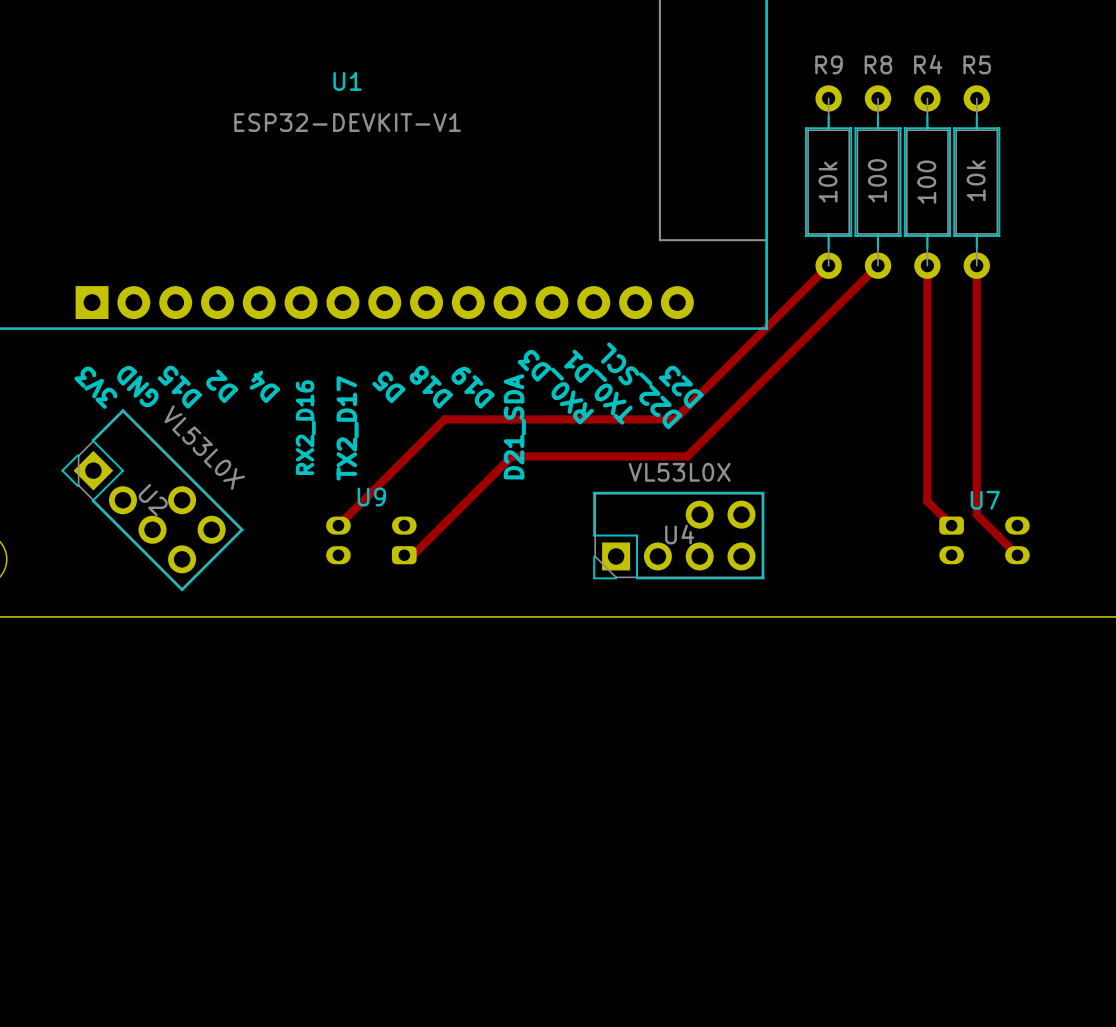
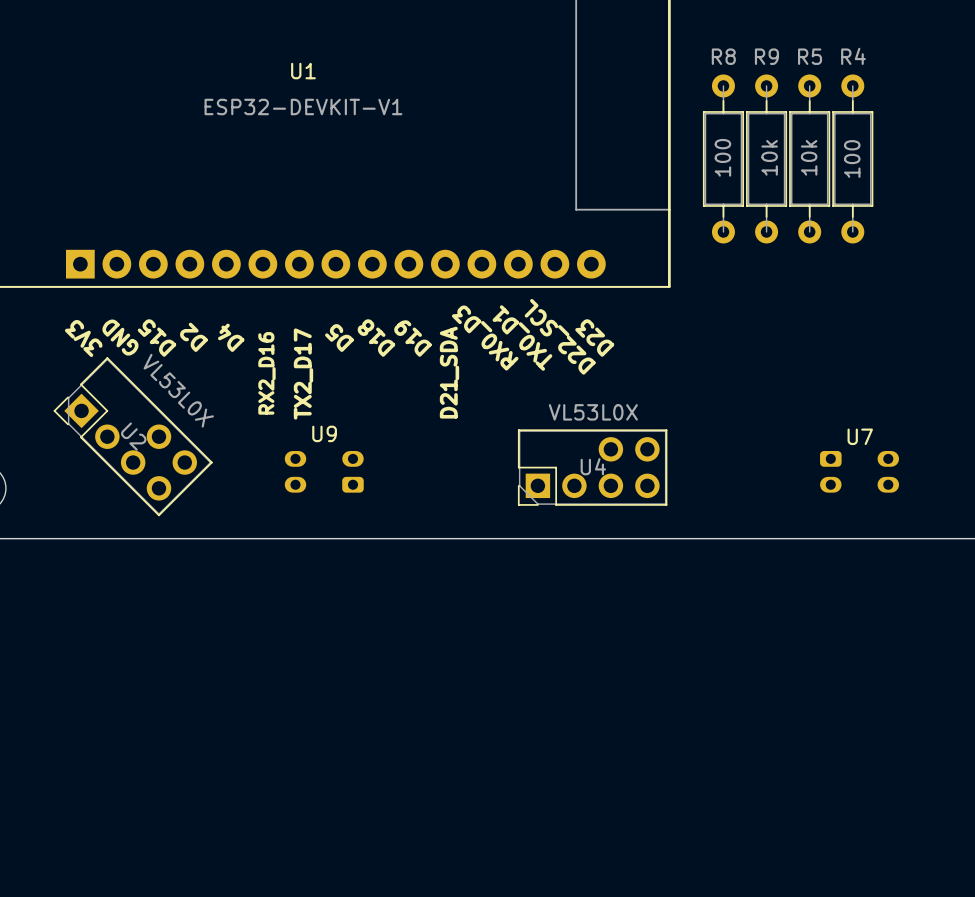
R9 name: R9 (829, 64) -> R8 (723, 56)
R8 name: R8 (878, 64) -> R9 (766, 56)
R4 name: R4 (928, 64) -> R5 (810, 56)
R5 name: R5 (977, 64) -> R4 (853, 56)
R8 value: 100 (877, 180) -> 10k (769, 157)
R5 value: 10k (976, 180) -> 100 (852, 158)
R9 value: 10k (828, 182) -> 100 (722, 157)
R4 value: 100 (926, 182) -> 10k (809, 157)
track: (828, 265) (674, 419) (444, 419) (338, 525) -> none
track: (878, 265) (687, 456) (511, 456) (413, 555) (404, 555) -> none
track: (927, 265) (927, 501) (951, 525) -> none
track: (976, 265) (976, 514) (1017, 555) -> none

